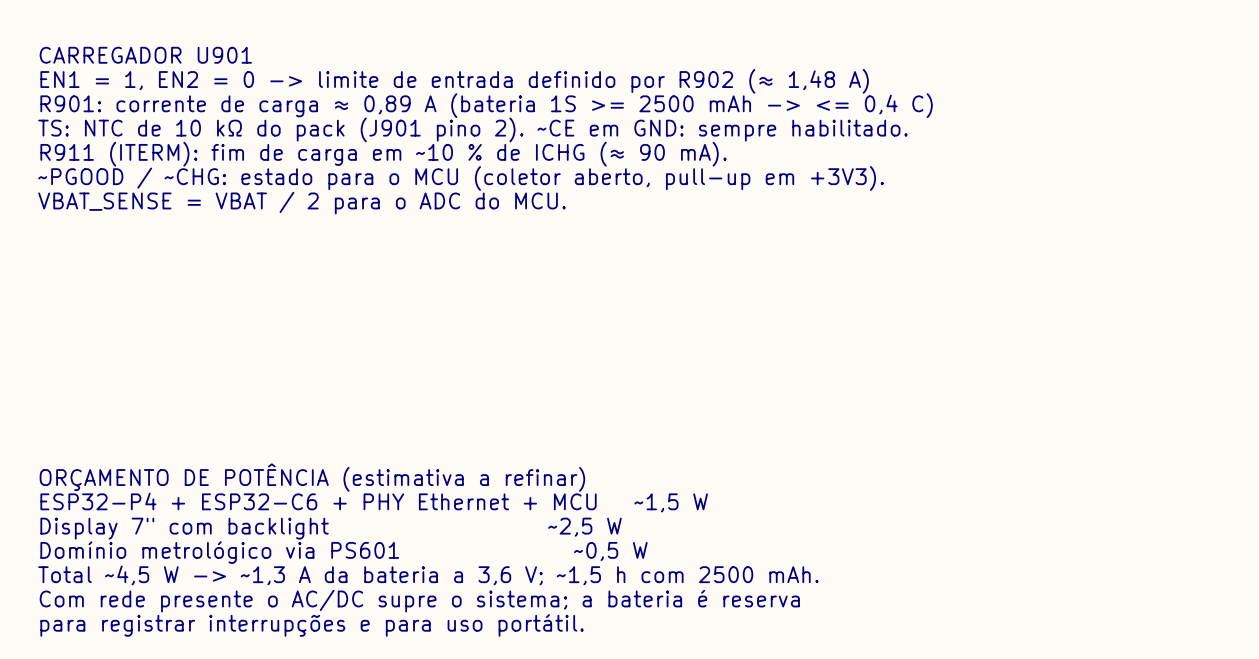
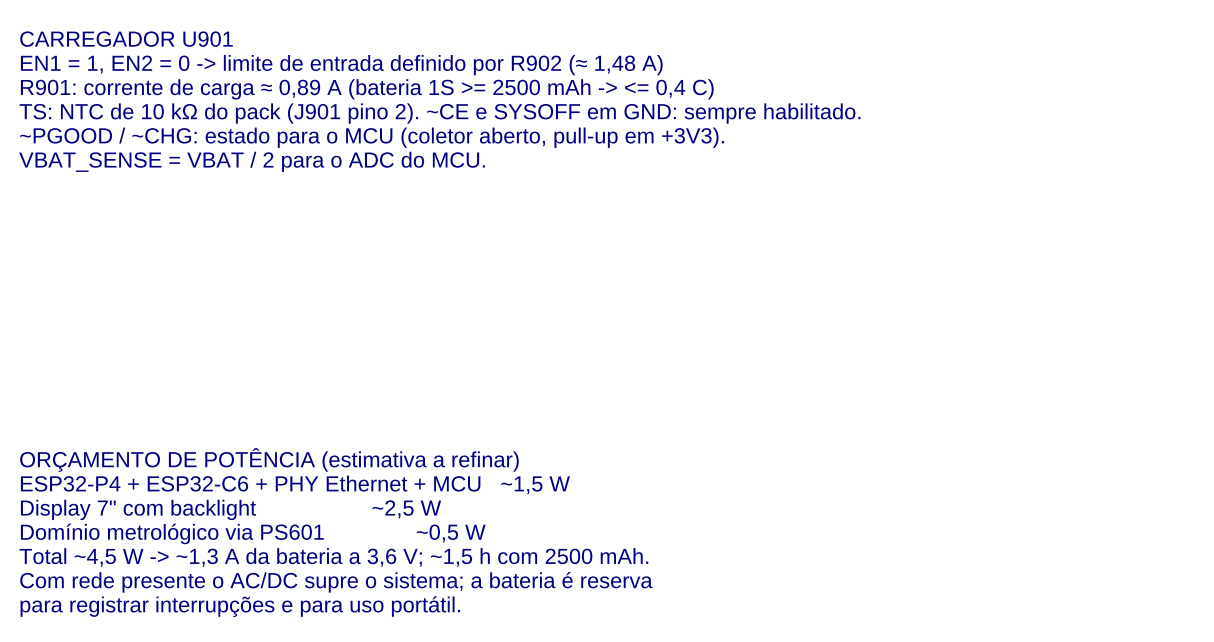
text: TS: NTC de 10 kΩ do pack (J901 pino 2). ~CE em GND: sempre habilitado. (472, 129) -> TS: NTC de 10 kΩ do pack (J901 pino 2). ~CE e SYSOFF em GND: sempre habilitado. (440, 113)
text: R911 (ITERM): fim de carga em ~10 % de ICHG (≈ 90 mA). (383, 154) -> ~PGOOD / ~CHG: estado para o MCU (coletor aberto, pull-up em +3V3). (372, 137)
text: ~PGOOD / ~CHG: estado para o MCU (coletor aberto, pull-up em +3V3). (461, 178) -> VBAT_SENSE = VBAT / 2 para o ADC do MCU. (252, 161)
text: VBAT_SENSE = VBAT / 2 para o ADC do MCU. (302, 203) -> none

